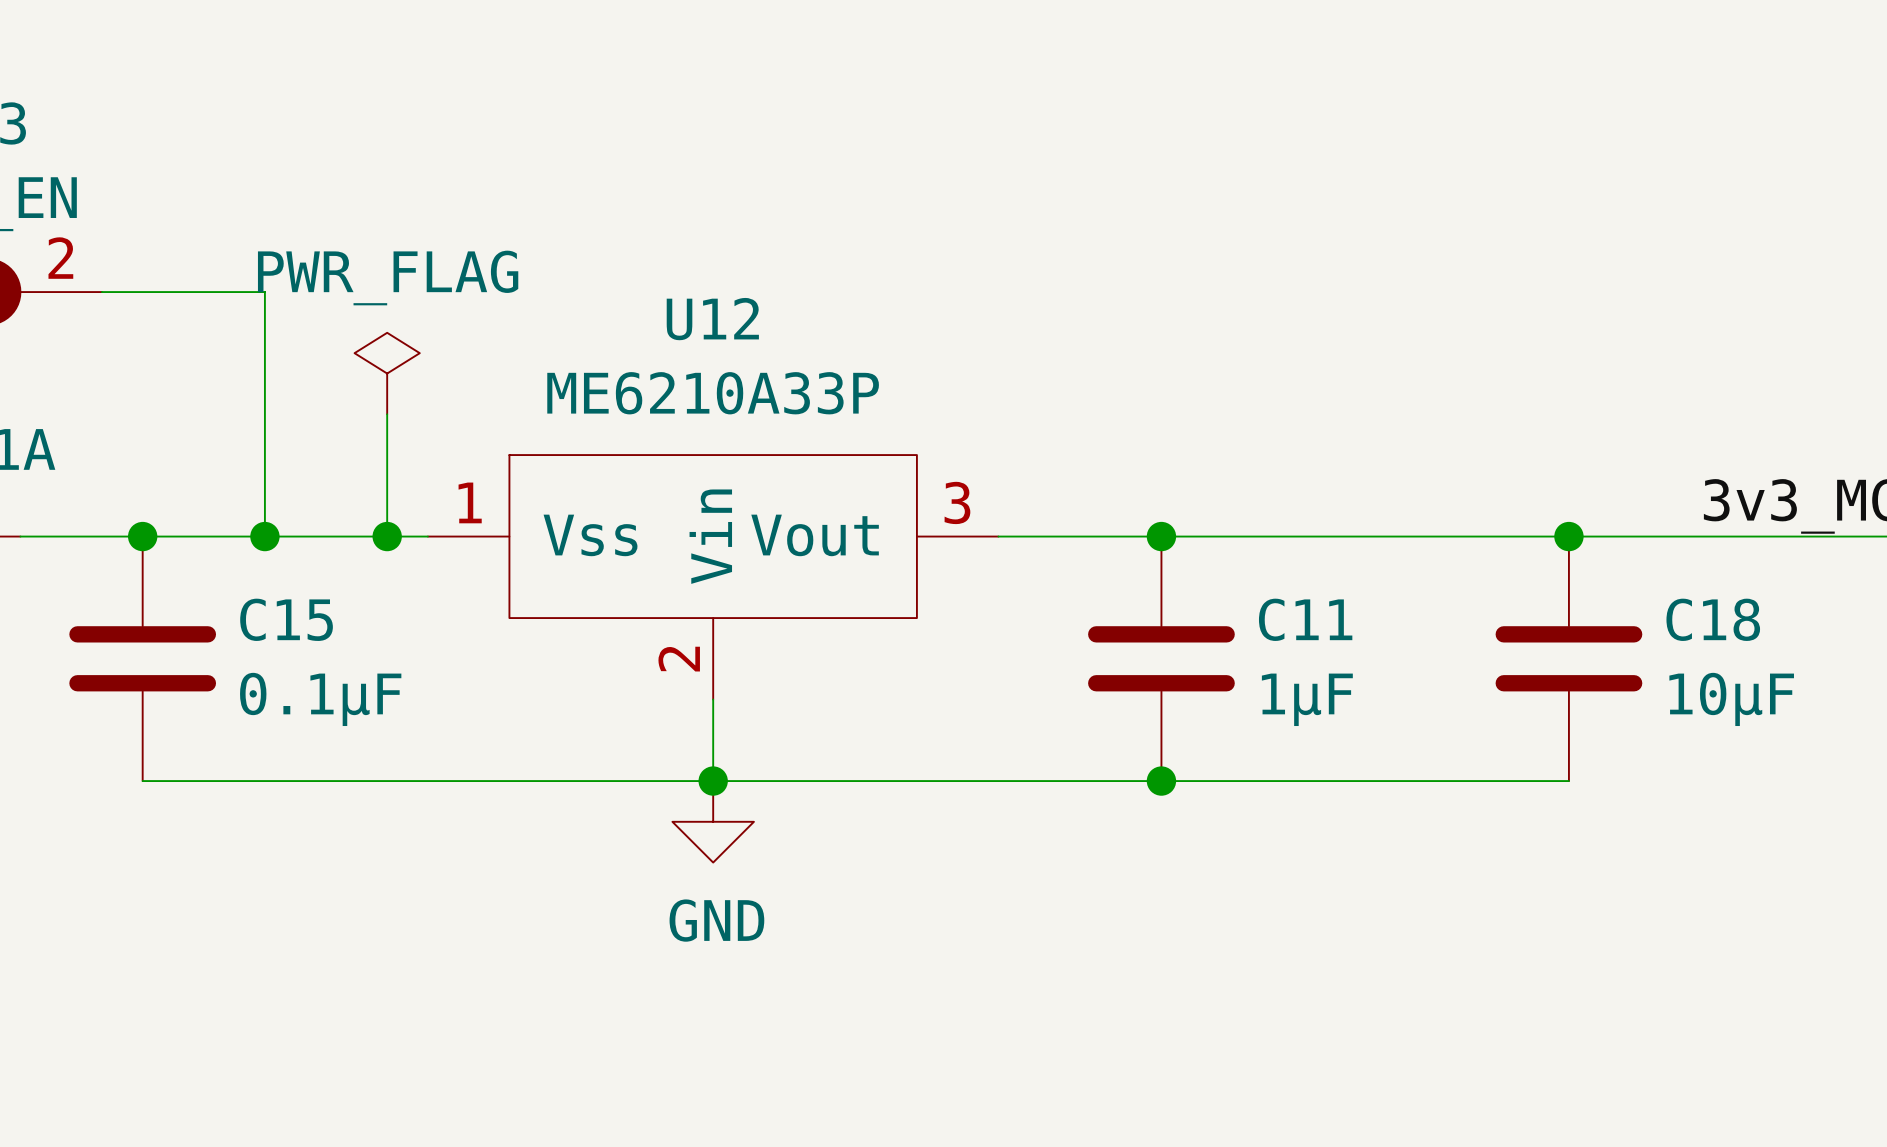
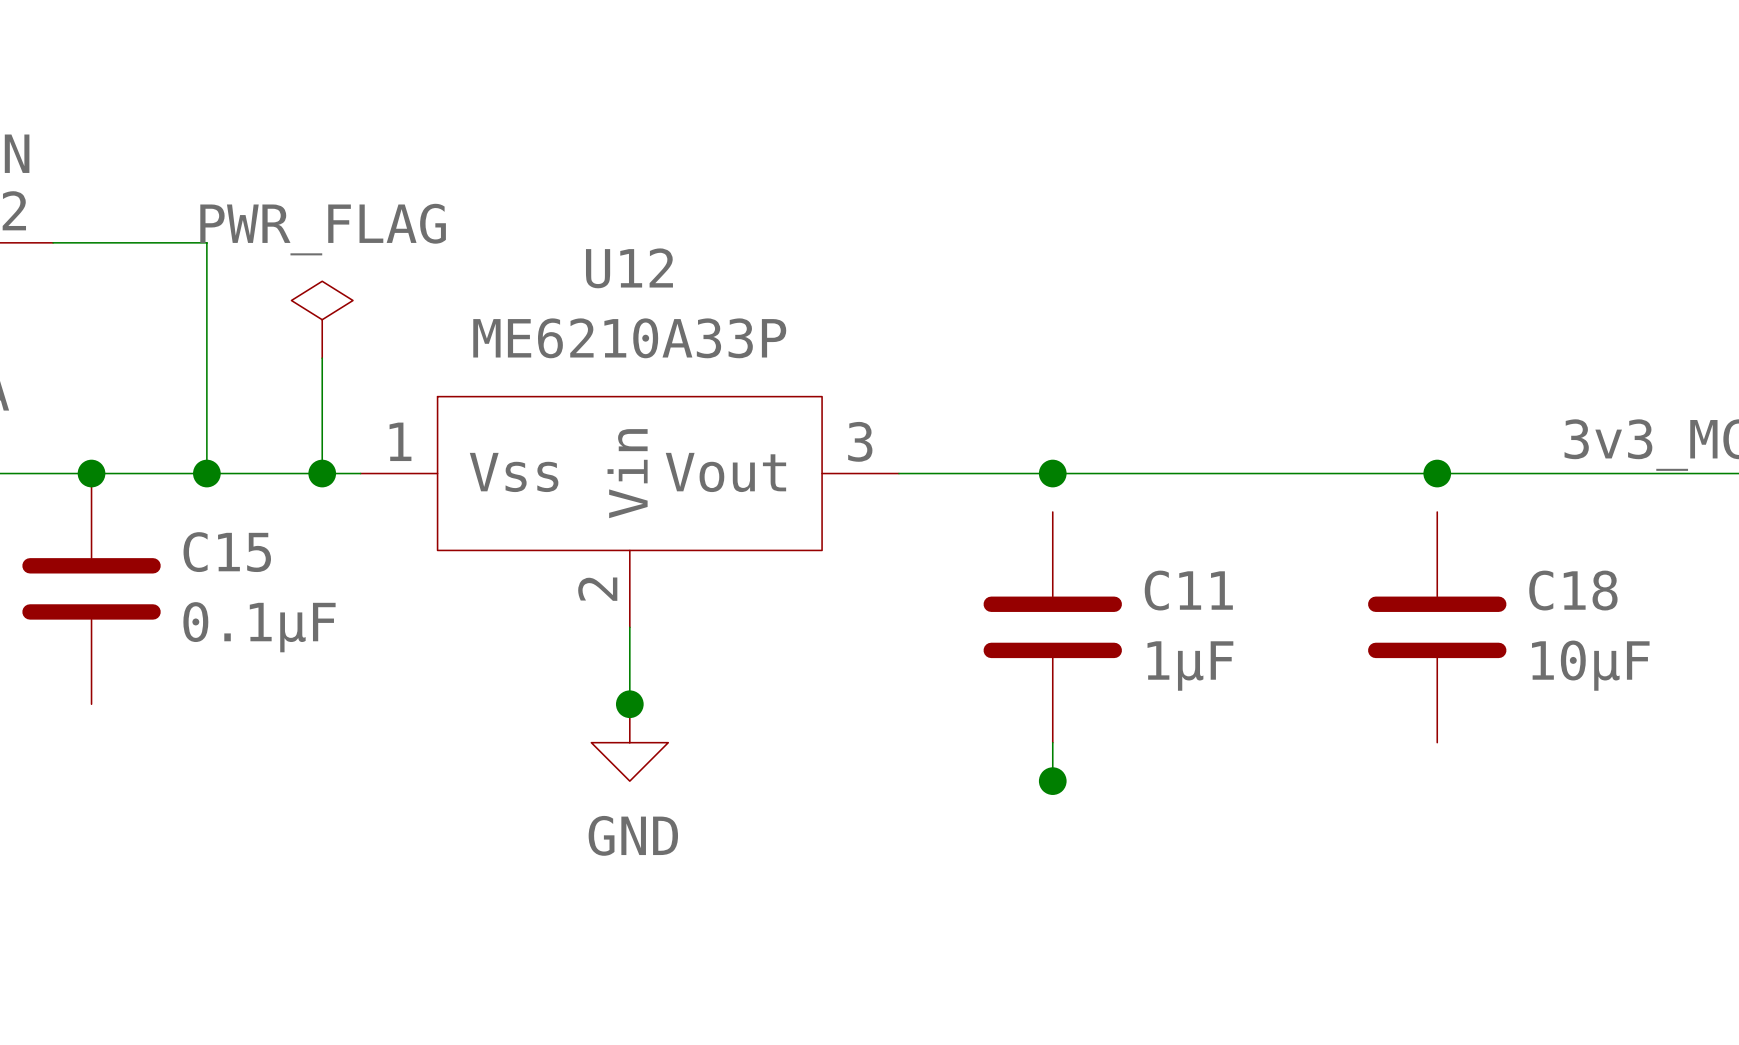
C11 position: (1161, 658) -> (1052, 627)
C18 position: (1568, 658) -> (1437, 627)
wire: (142, 781) (1568, 781) -> none
junction position: (1161, 781) -> (1052, 781)
wire: none -> (1052, 742) (1052, 781)

